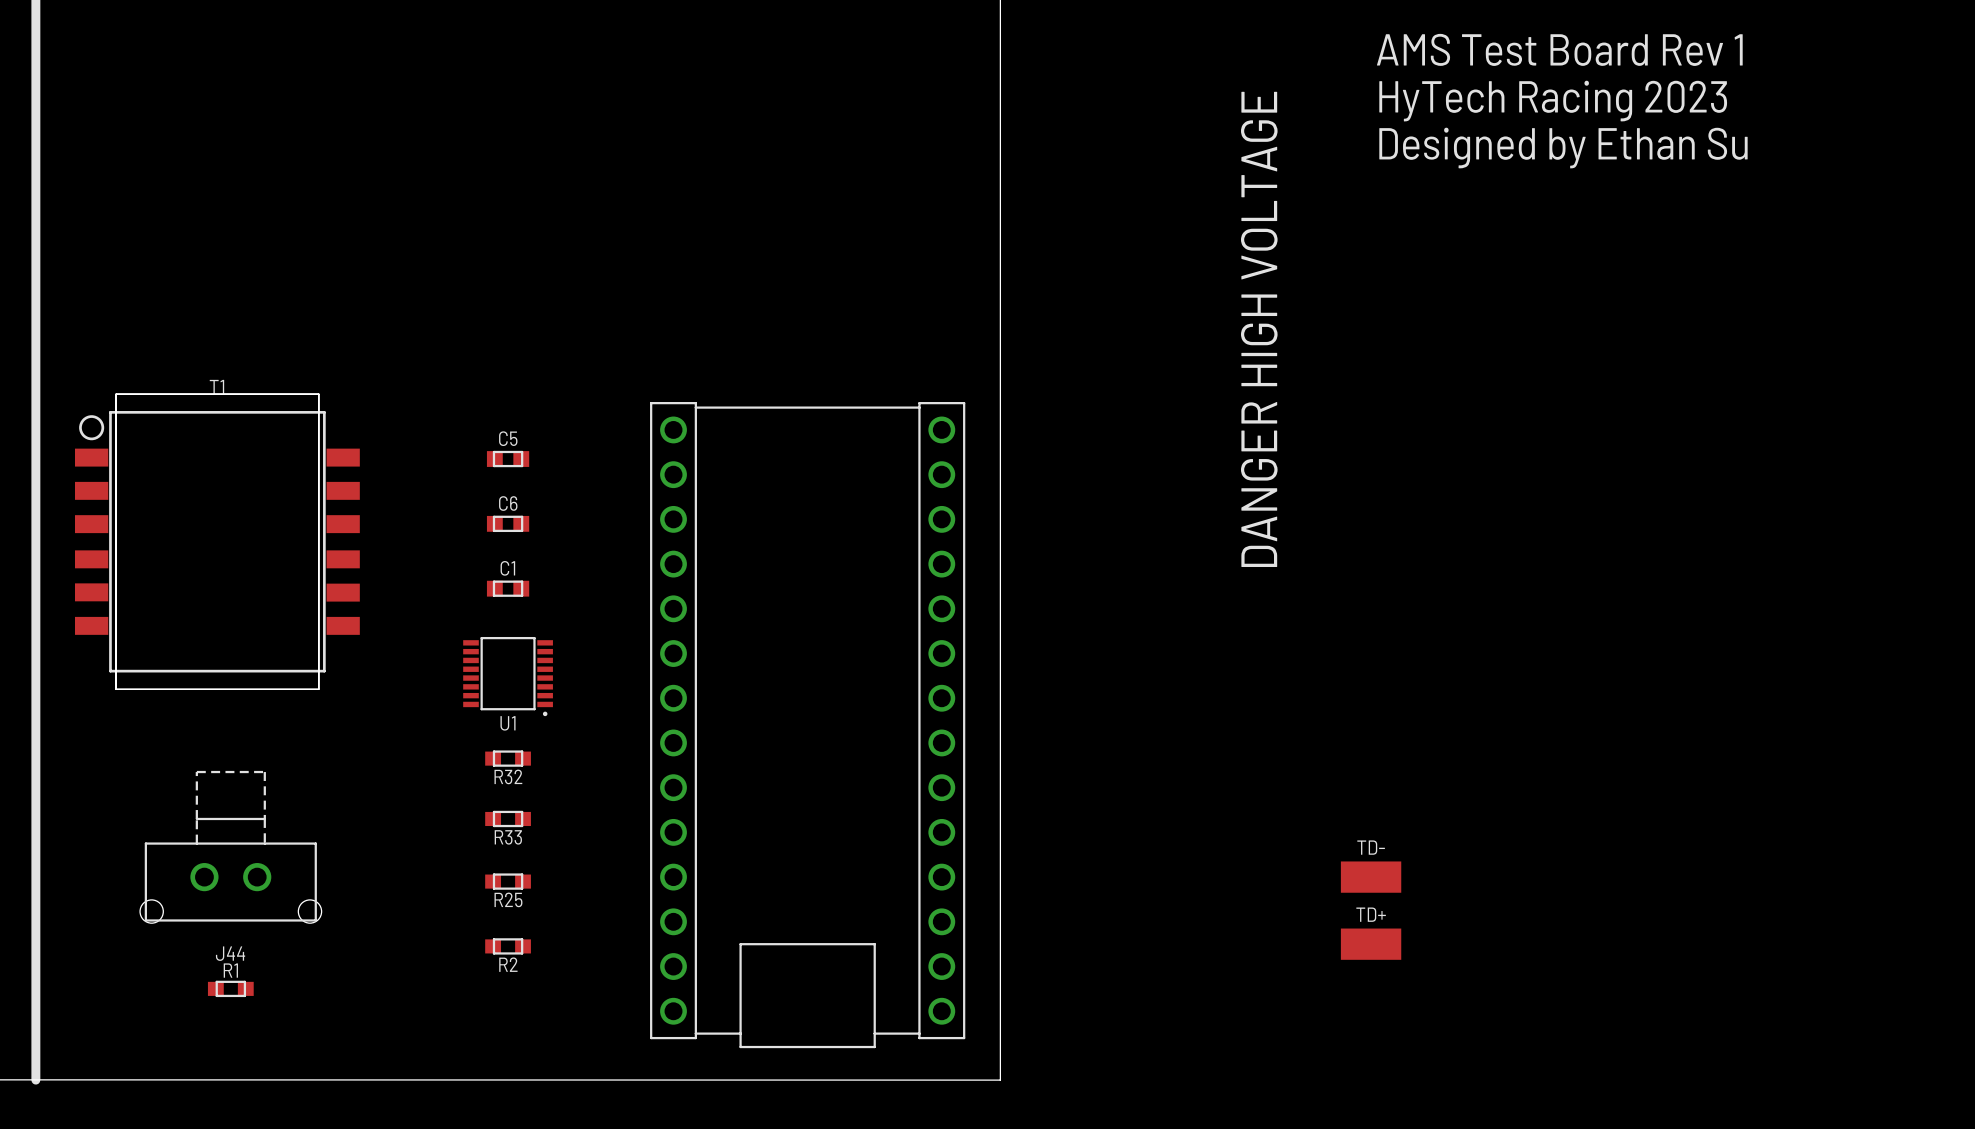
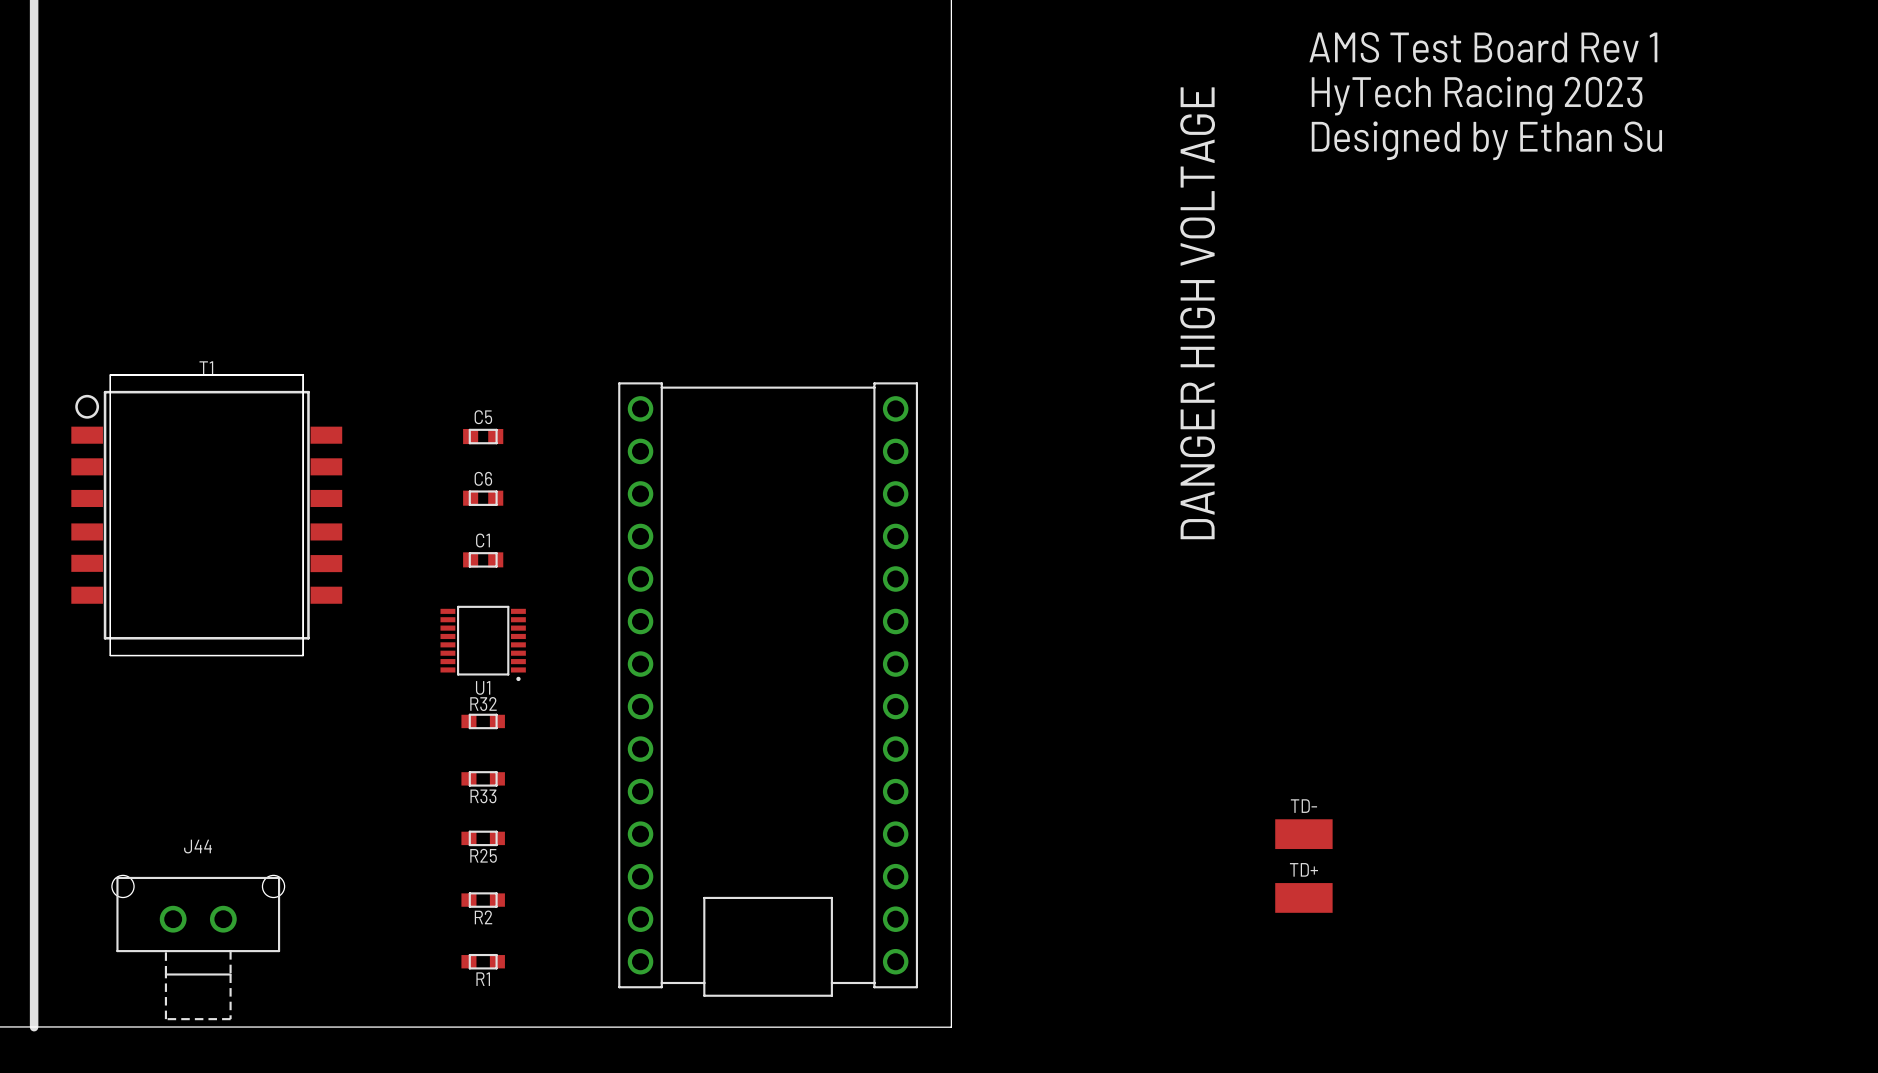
R32 name position: R32 (508, 776) -> R32 (483, 704)
J44 rotation: 0° (230, 847) -> 180° (198, 947)
J44 position: (230, 847) -> (198, 947)
R1 name position: R1 (230, 970) -> R1 (483, 979)
R1 position: (230, 988) -> (483, 961)

